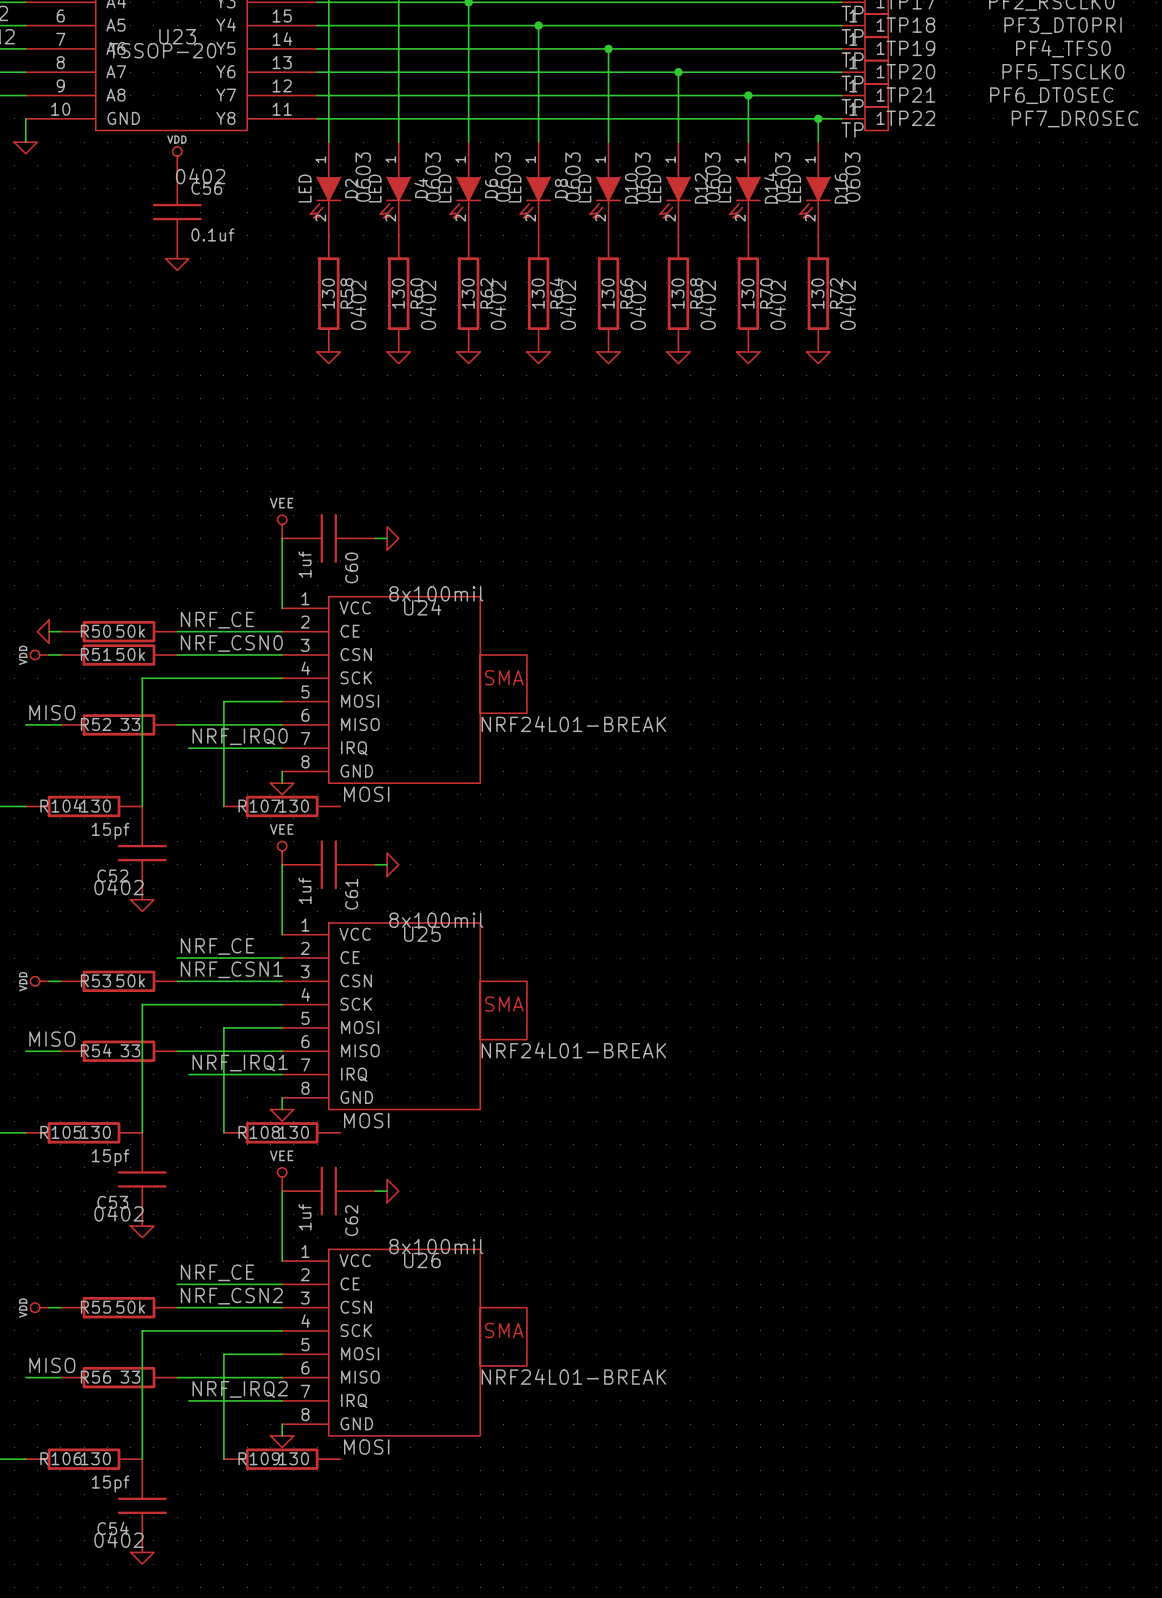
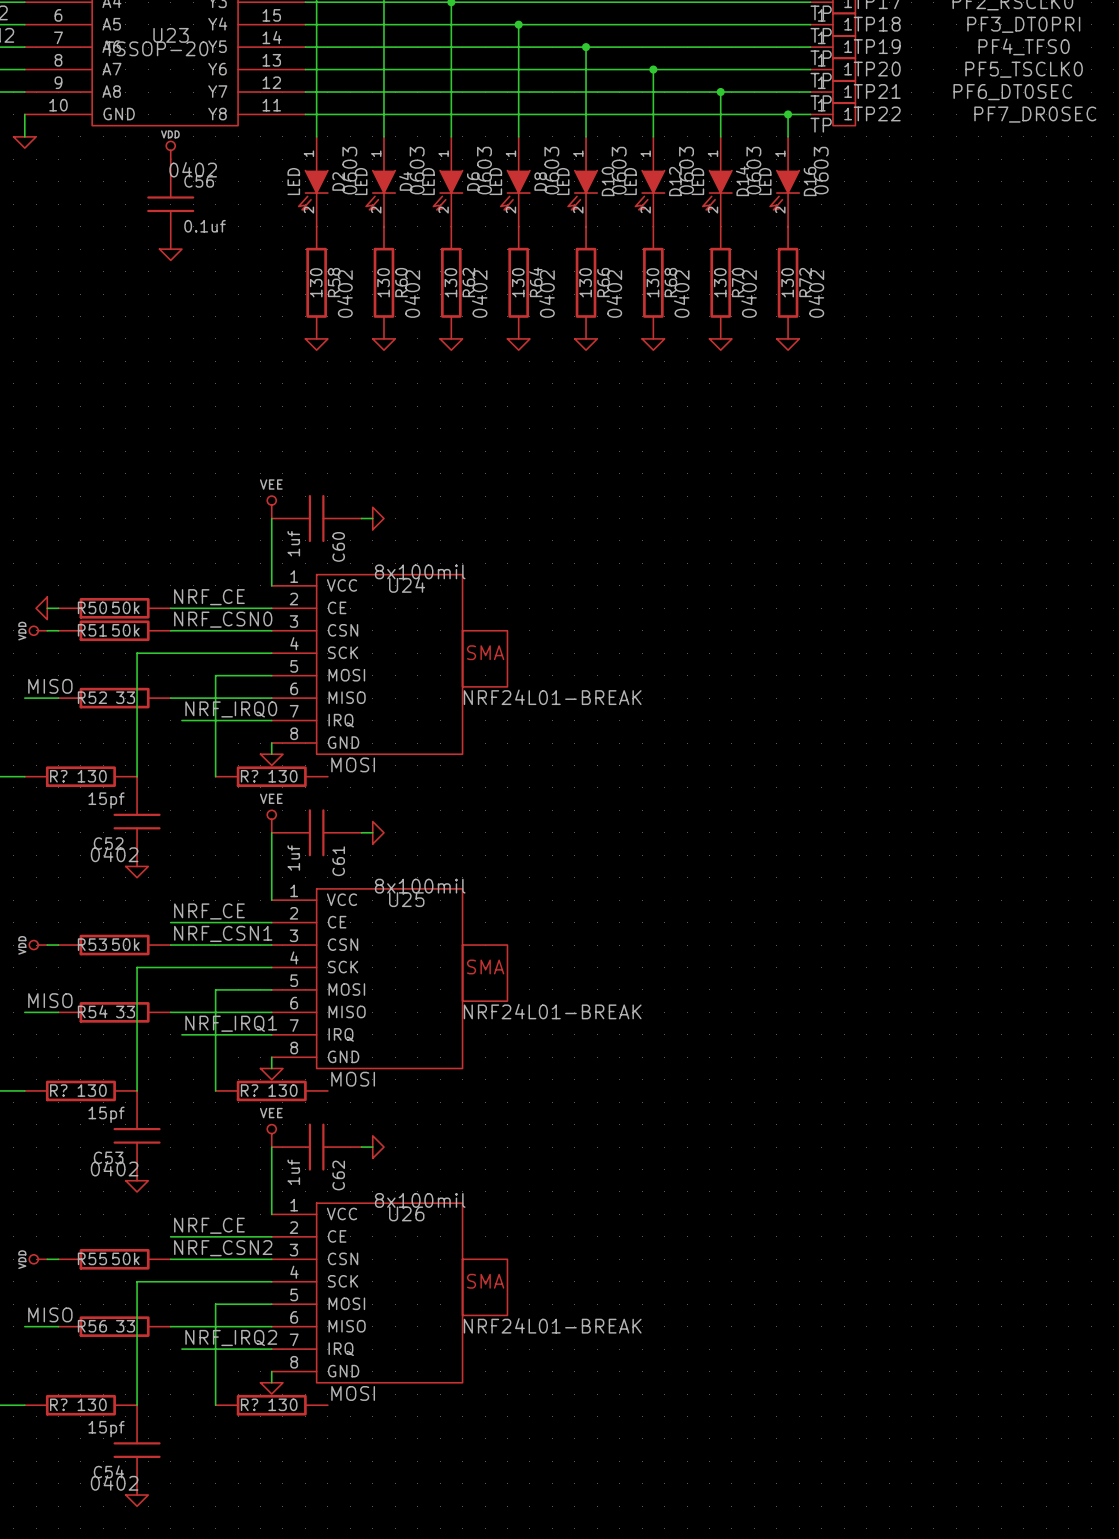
R104 name: R104 (61, 805) -> R? (58, 776)
R107 name: R107 (259, 806) -> R? (249, 776)
R105 name: R105 (61, 1132) -> R? (58, 1090)
R108 name: R108 (259, 1132) -> R? (249, 1090)
R106 name: R106 (61, 1458) -> R? (58, 1404)
R109 name: R109 (259, 1458) -> R? (249, 1404)

